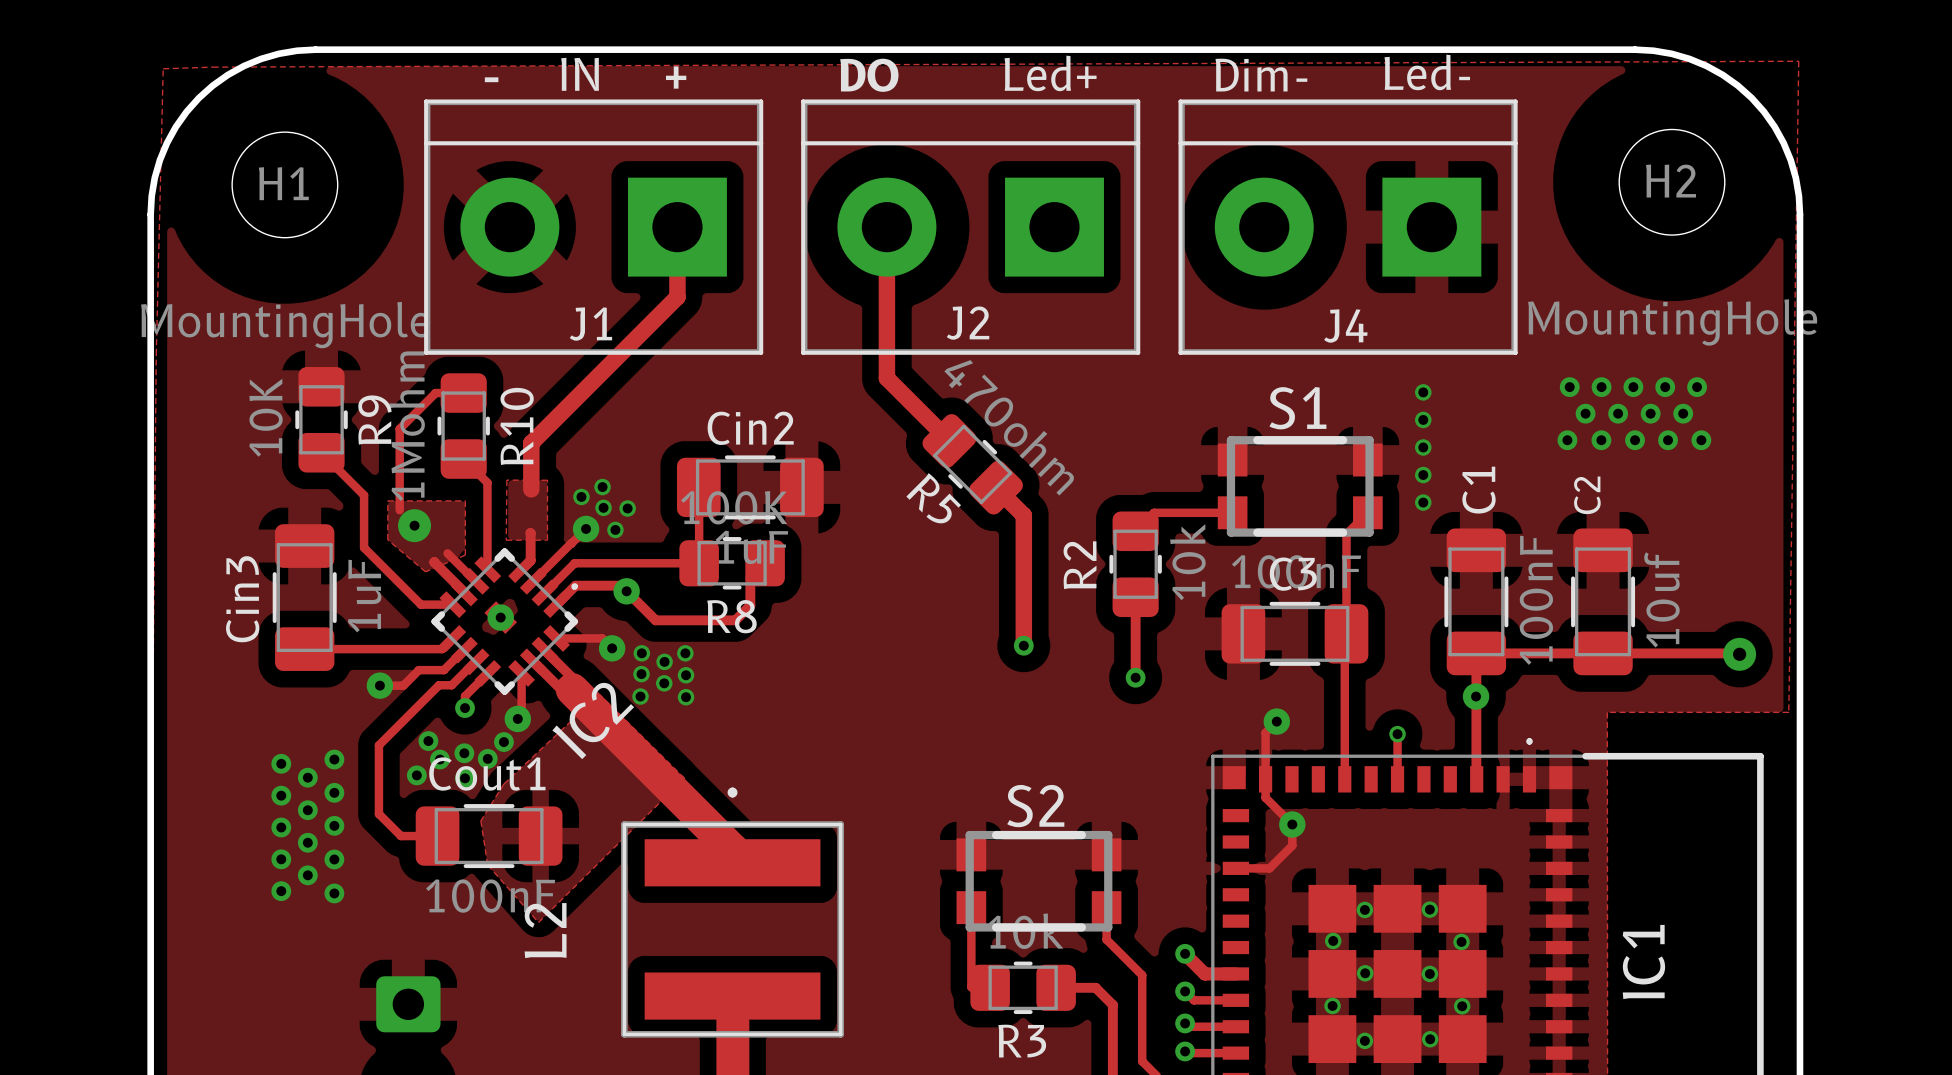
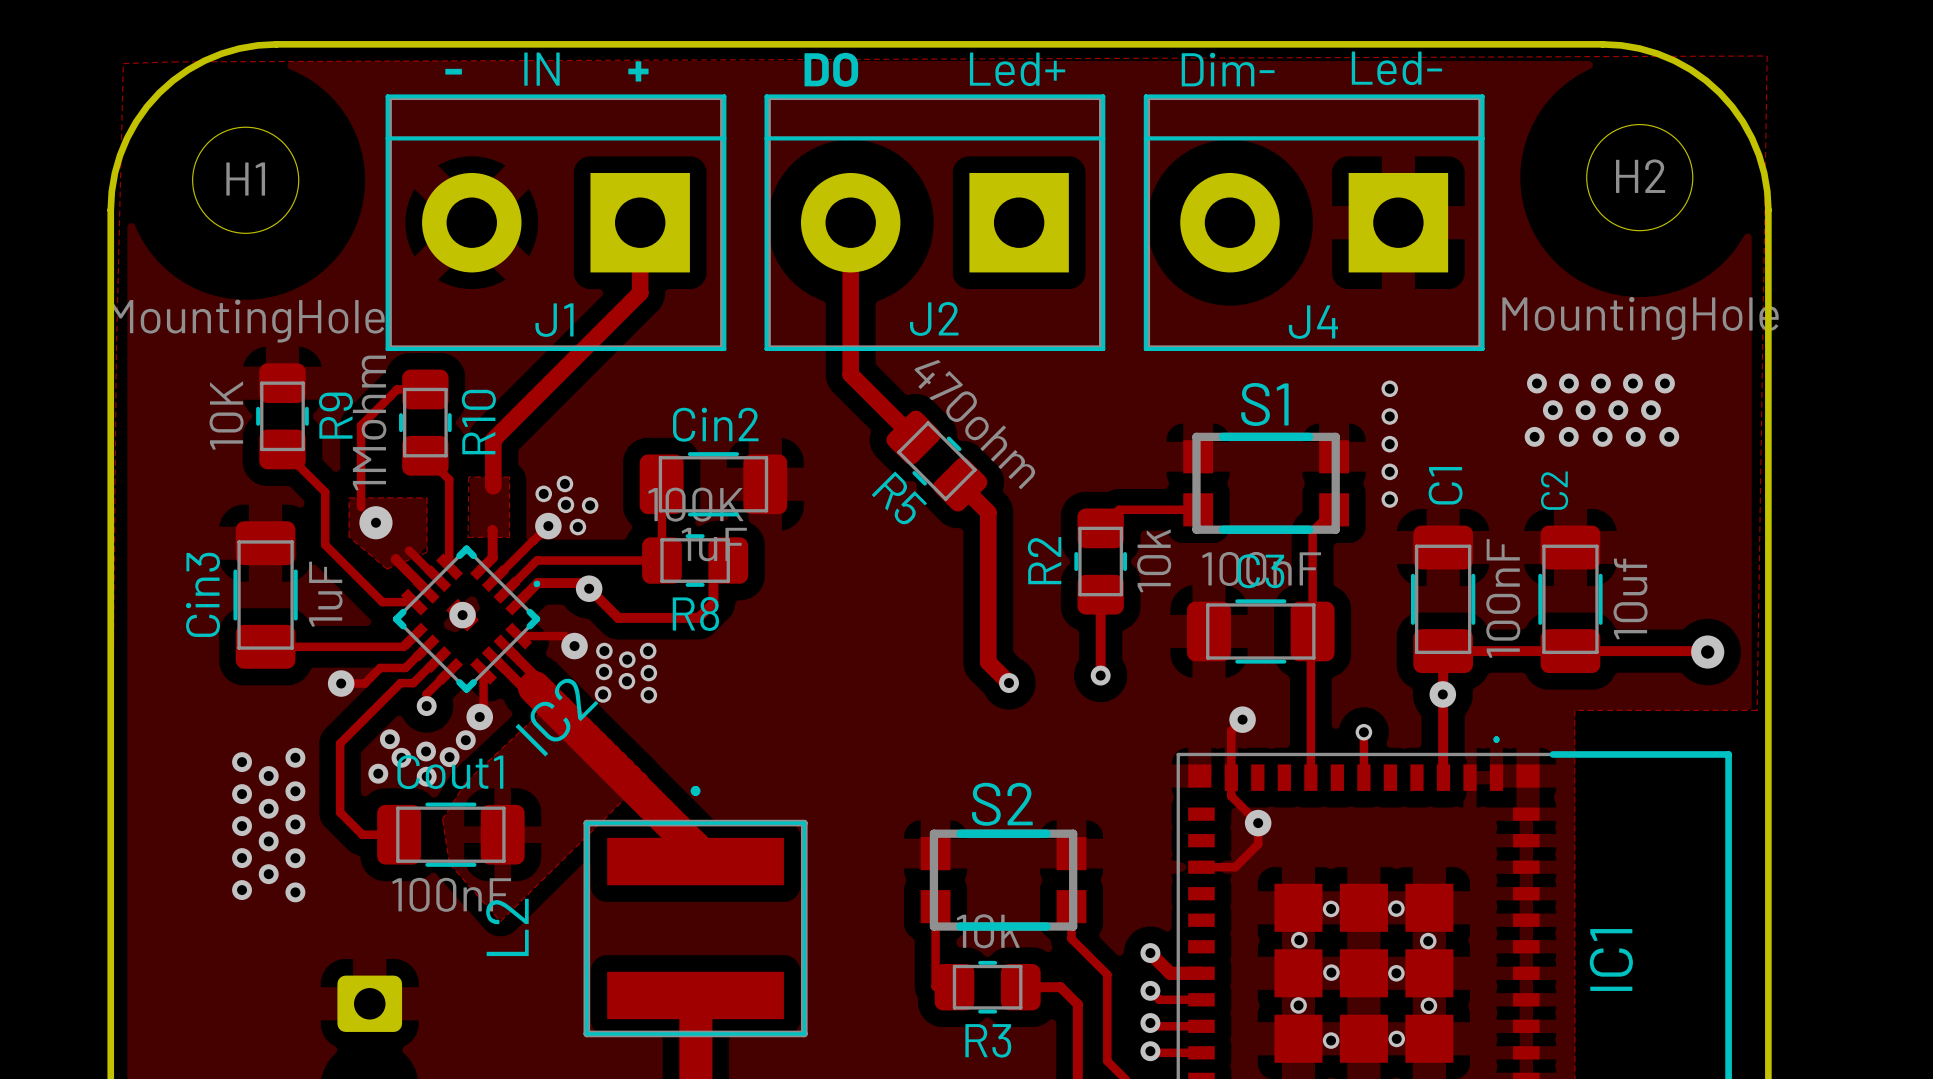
track: none -> (988, 643) (988, 662) (1009, 683)
via position: (1023, 645) -> (1009, 683)

